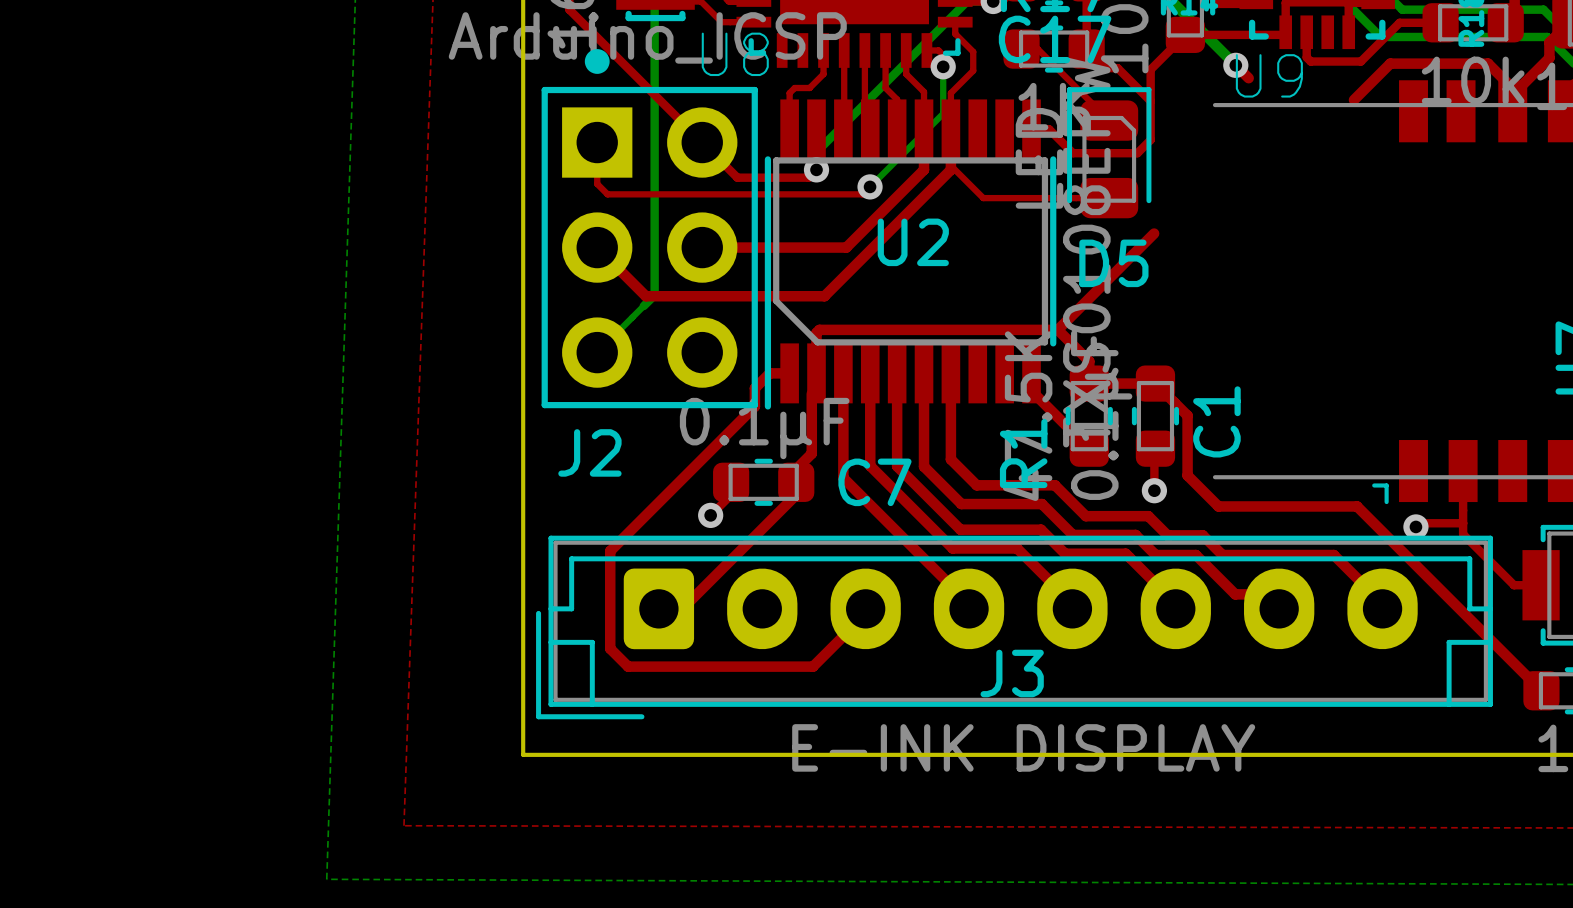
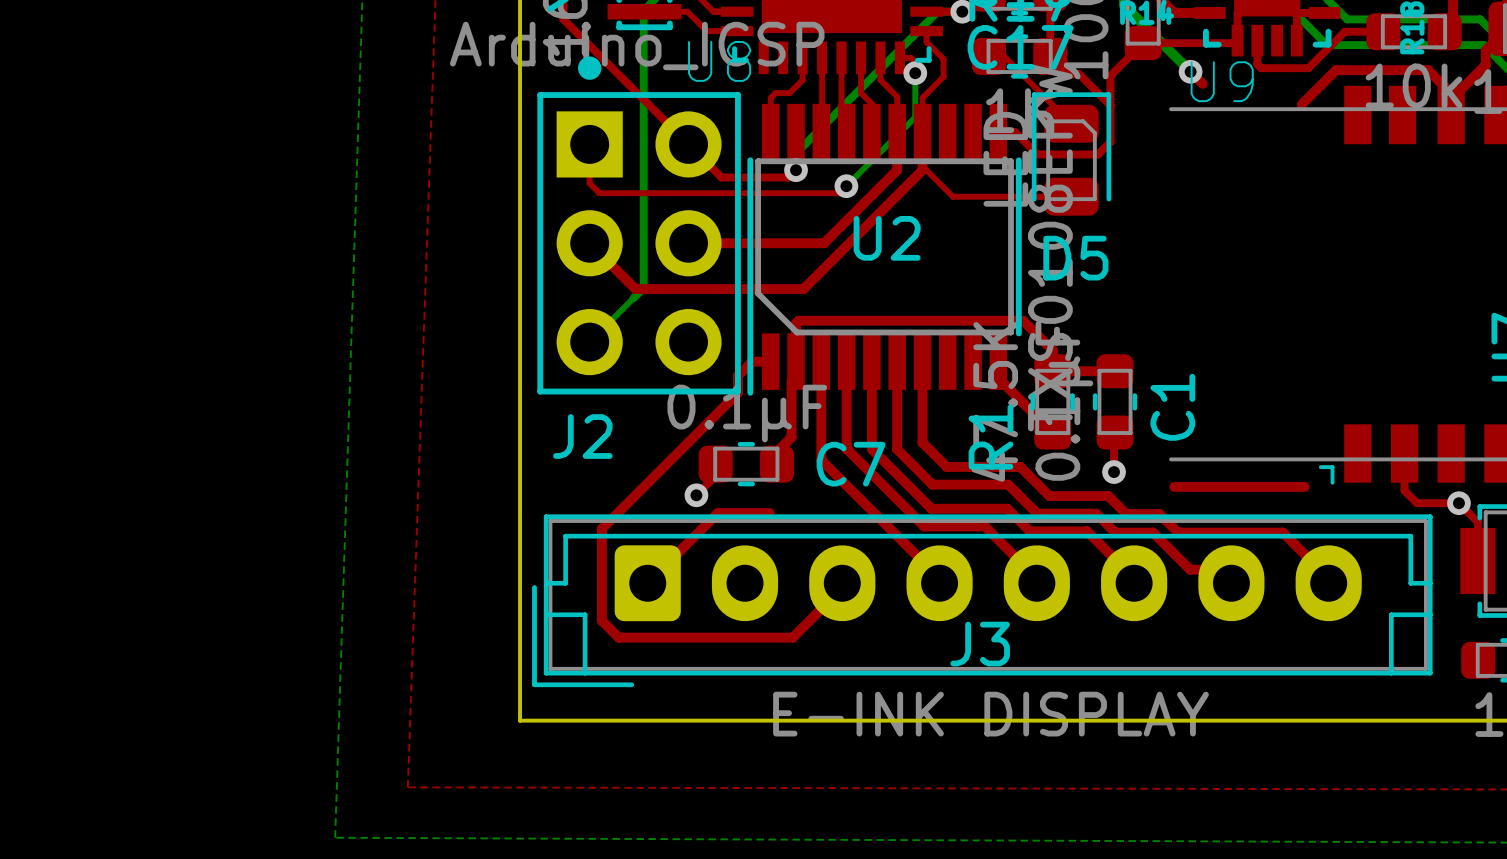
top track: (1154, 233) (1057, 329) -> none
top track: (1155, 383) (1187, 415) (1187, 475) (1218, 506) -> none
top track: (796, 494) (670, 620) -> none
top track: (1357, 506) (1541, 690) -> none
top track: (1463, 510) (1463, 534) (1514, 585) (1541, 585) -> (1404, 490) (1417, 503) (1458, 503) (1477, 522) (1477, 561)
top track: (1463, 523) (1419, 523) (1415, 526) -> none
via position: (1415, 526) -> (1458, 503)
top track: none -> (769, 513) (717, 513) (647, 583)

